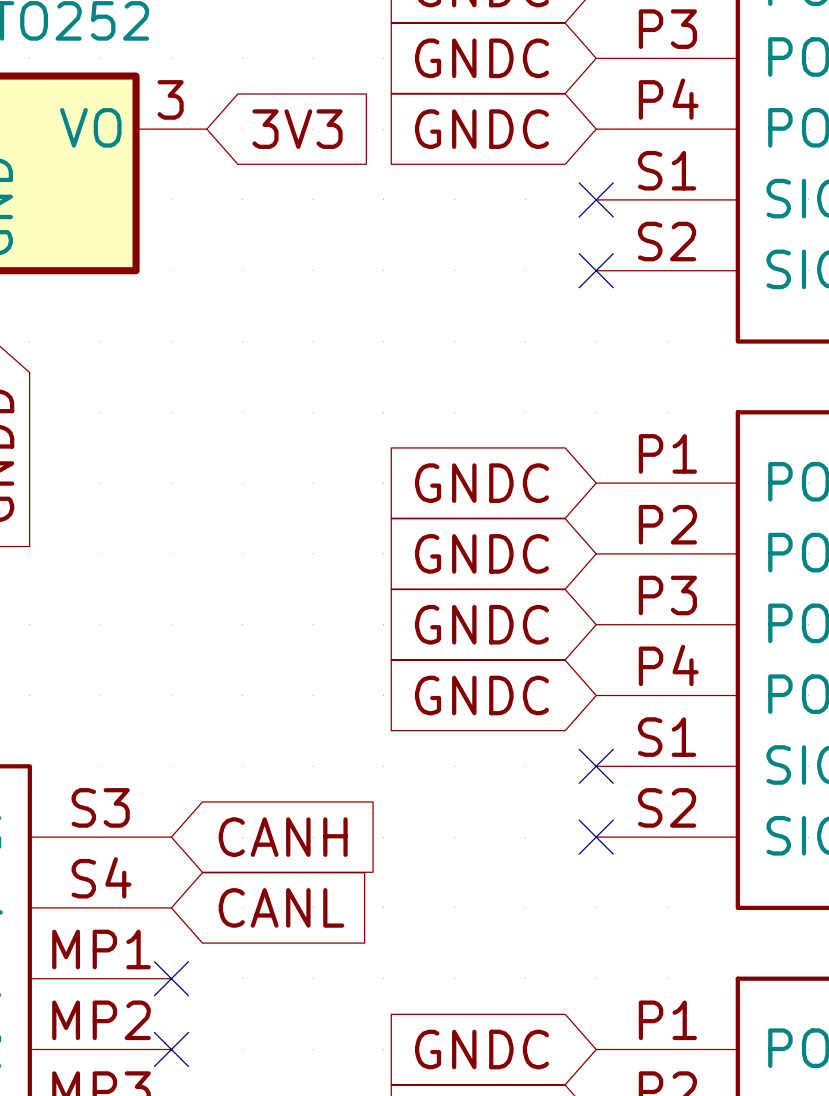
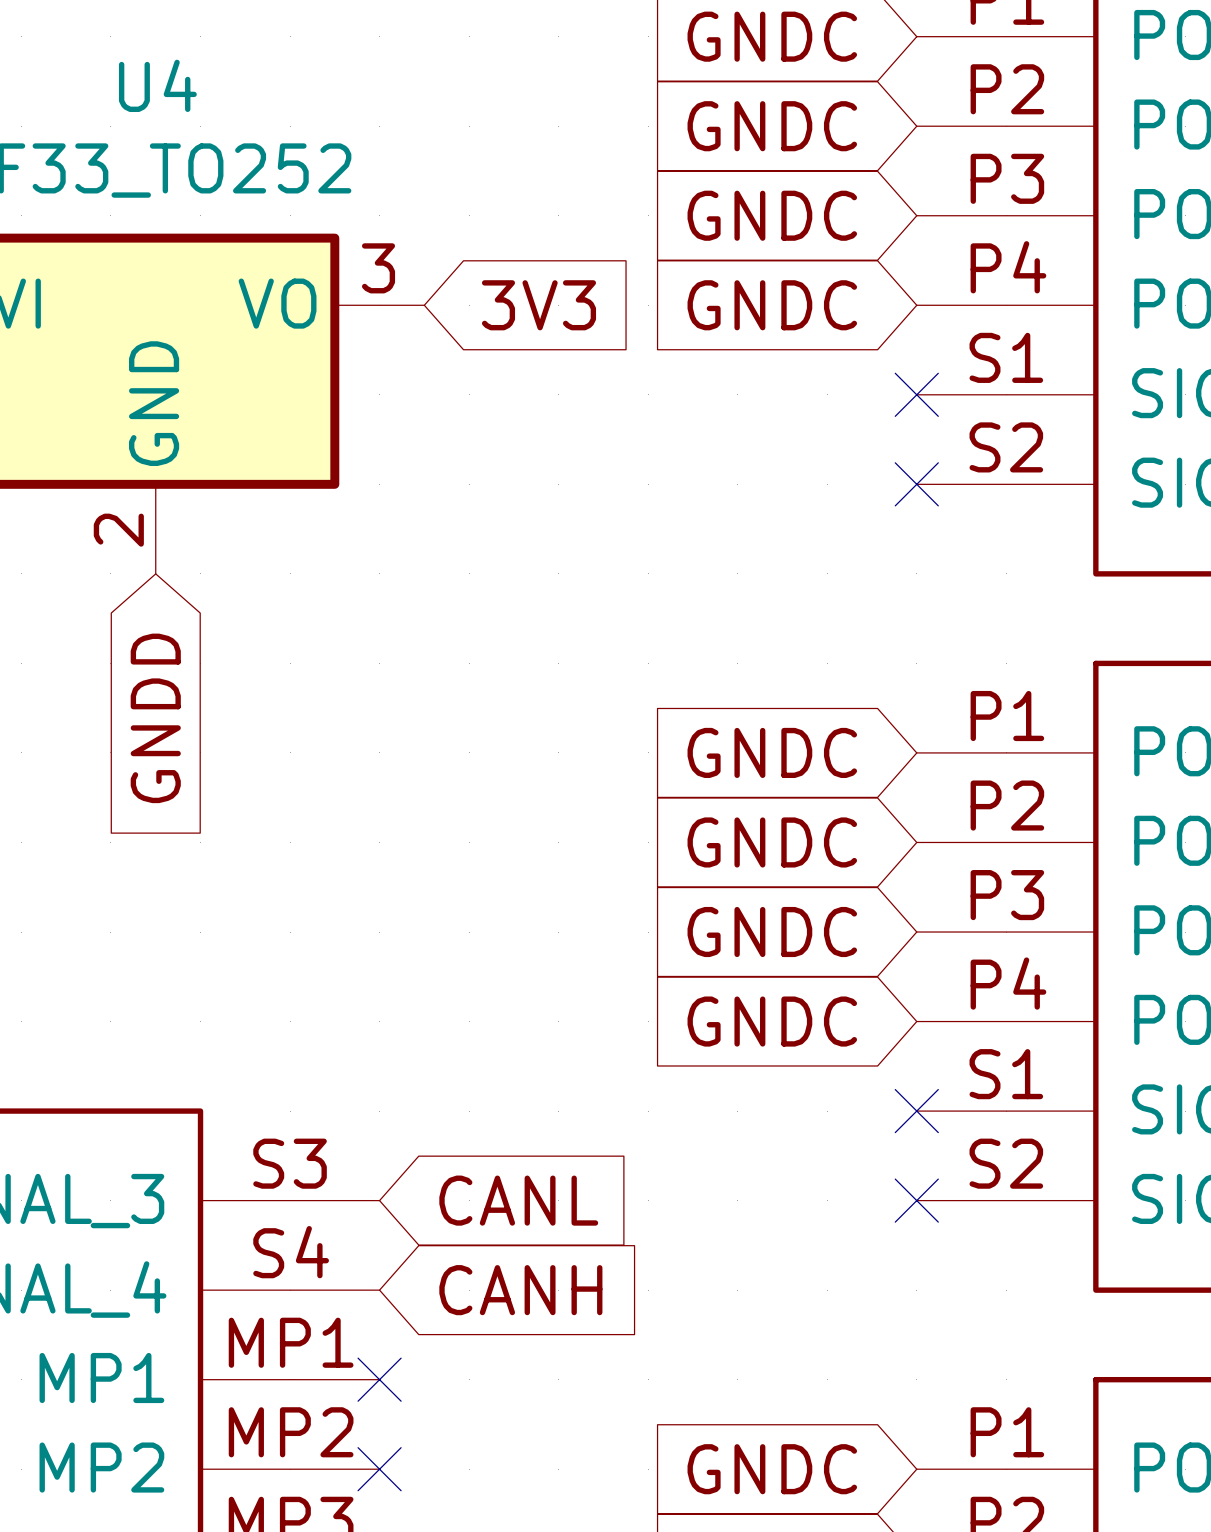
global label: CANH (283, 837) -> CANL (518, 1200)
global label: CANL (281, 907) -> CANH (520, 1290)

